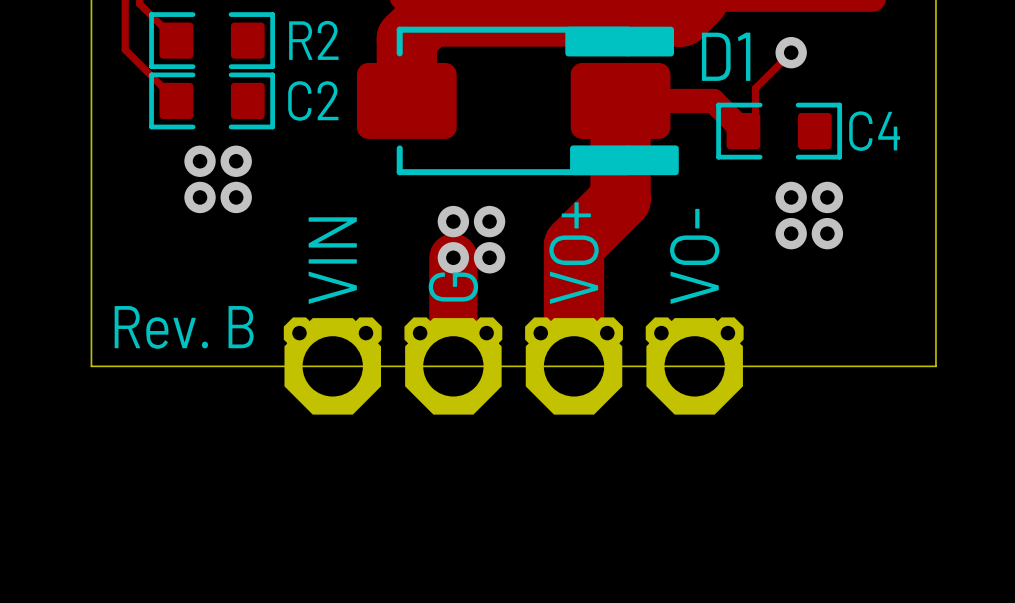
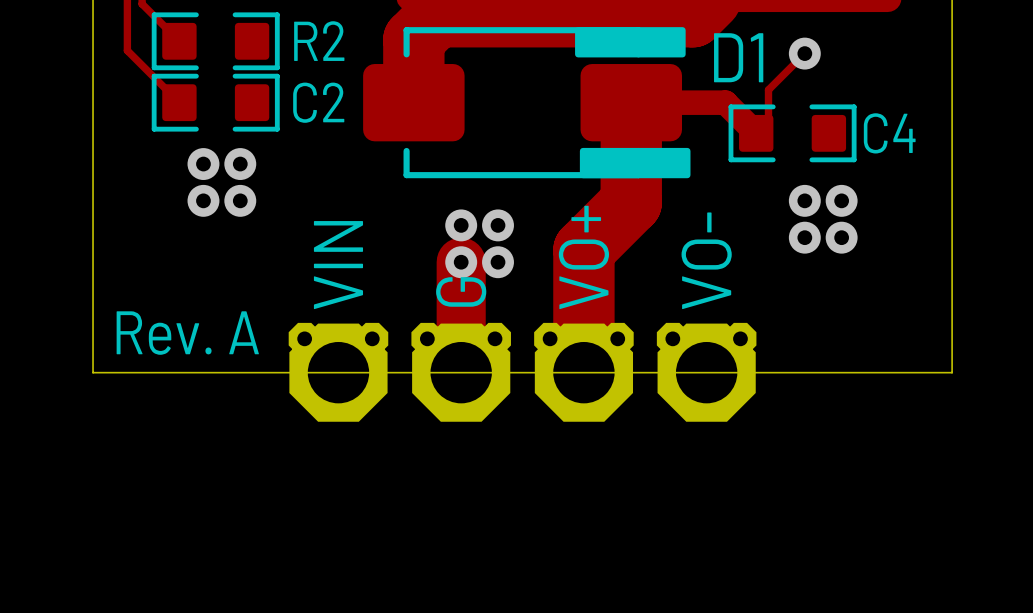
text: Rev. B (184, 327) -> Rev. A (187, 333)

